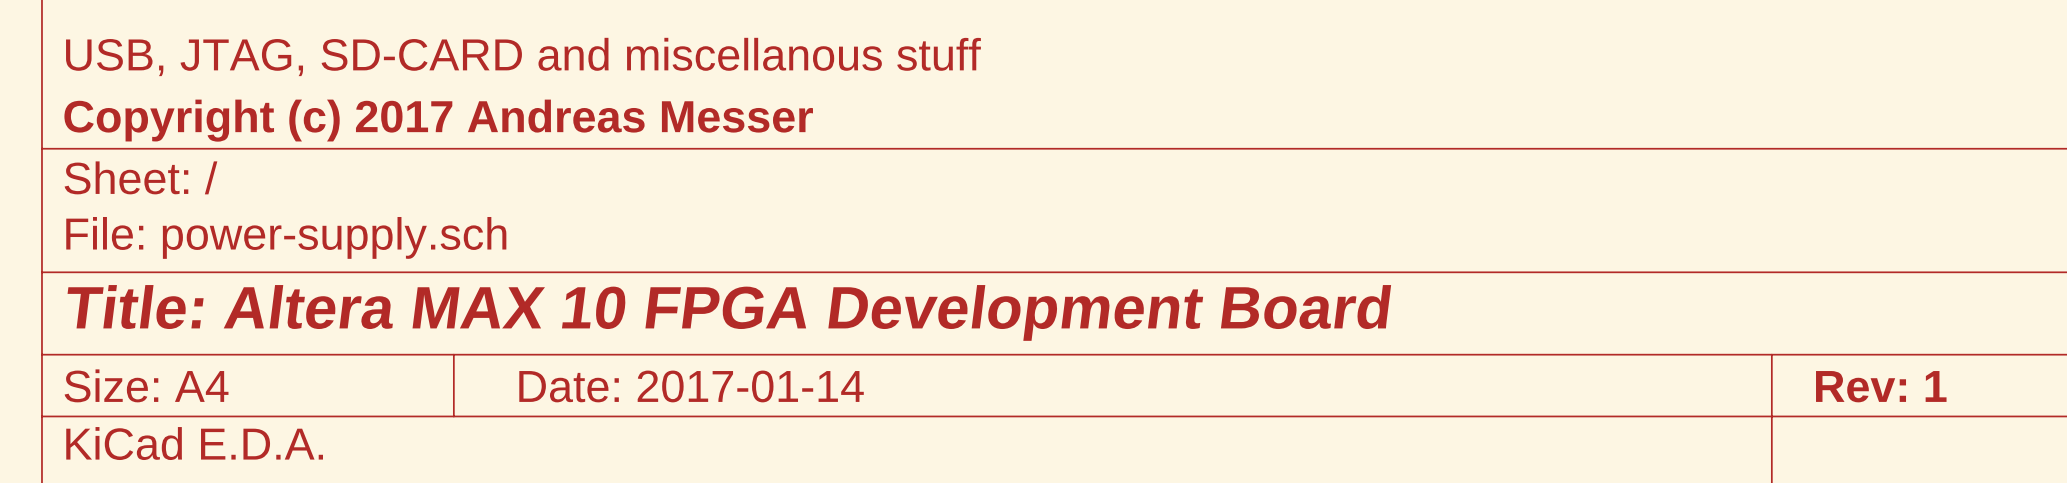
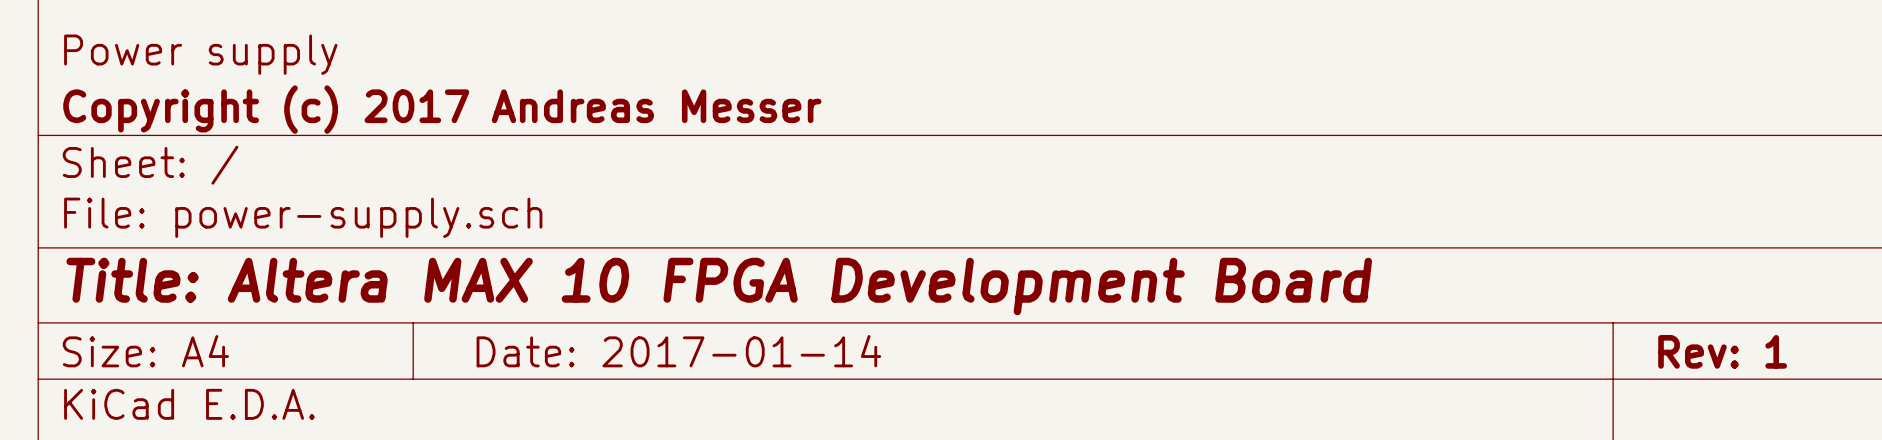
title block: USB, JTAG, SD-CARD and miscellanous stuff (523, 56) -> Power supply (200, 54)

